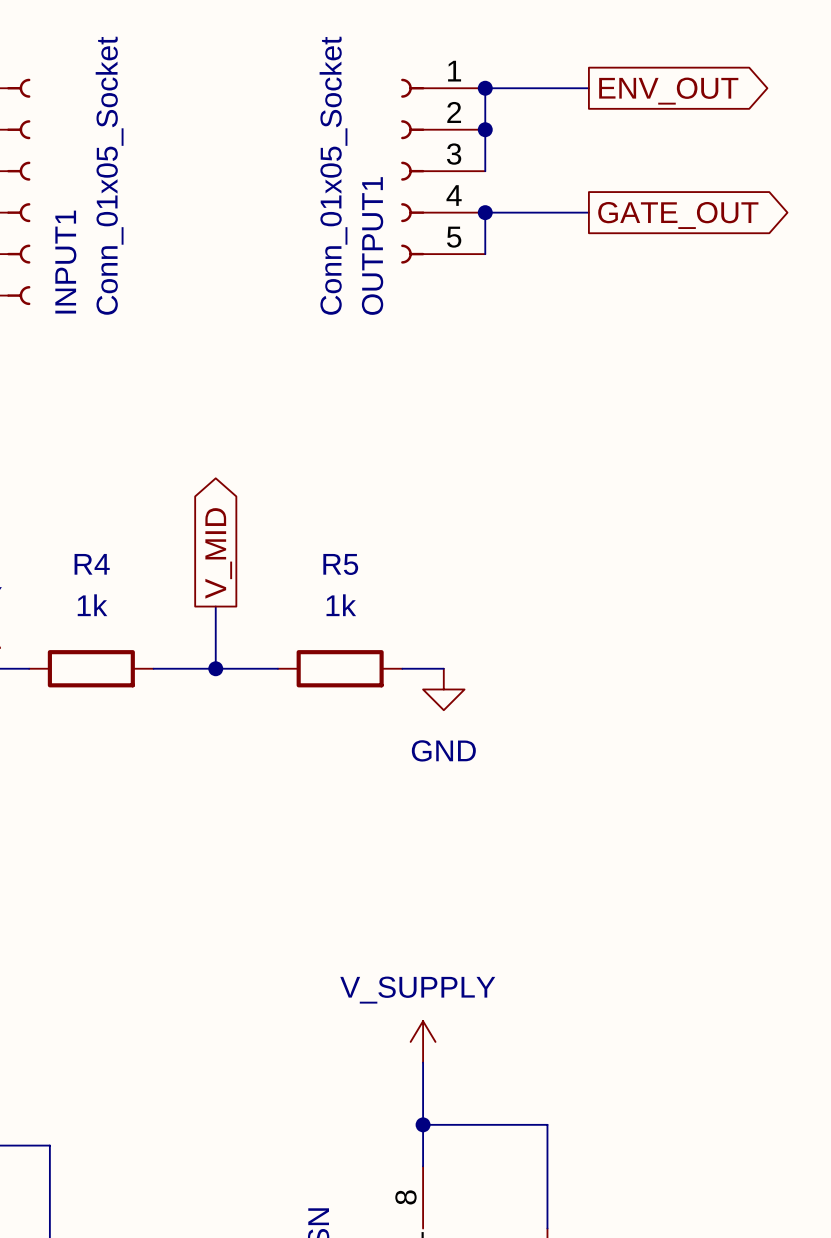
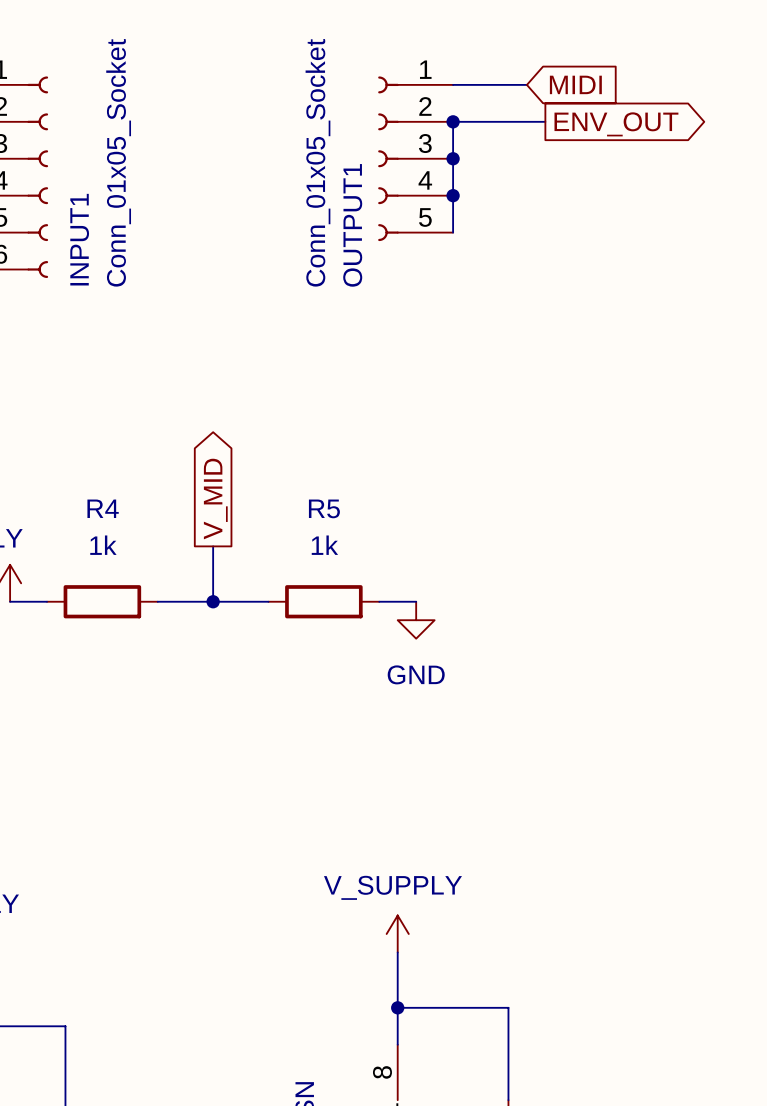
wire: (485, 88) (485, 129) -> (545, 121) (453, 121)
junction position: (485, 88) -> (453, 158)
wire: (568, 88) (588, 88) -> none
global label: none -> MIDI (575, 84)
global label position: ENV_OUT (668, 91) -> ENV_OUT (616, 124)
wire: (485, 212) (588, 212) -> (453, 195) (453, 158)
global label: GATE_OUT (678, 215) -> none

